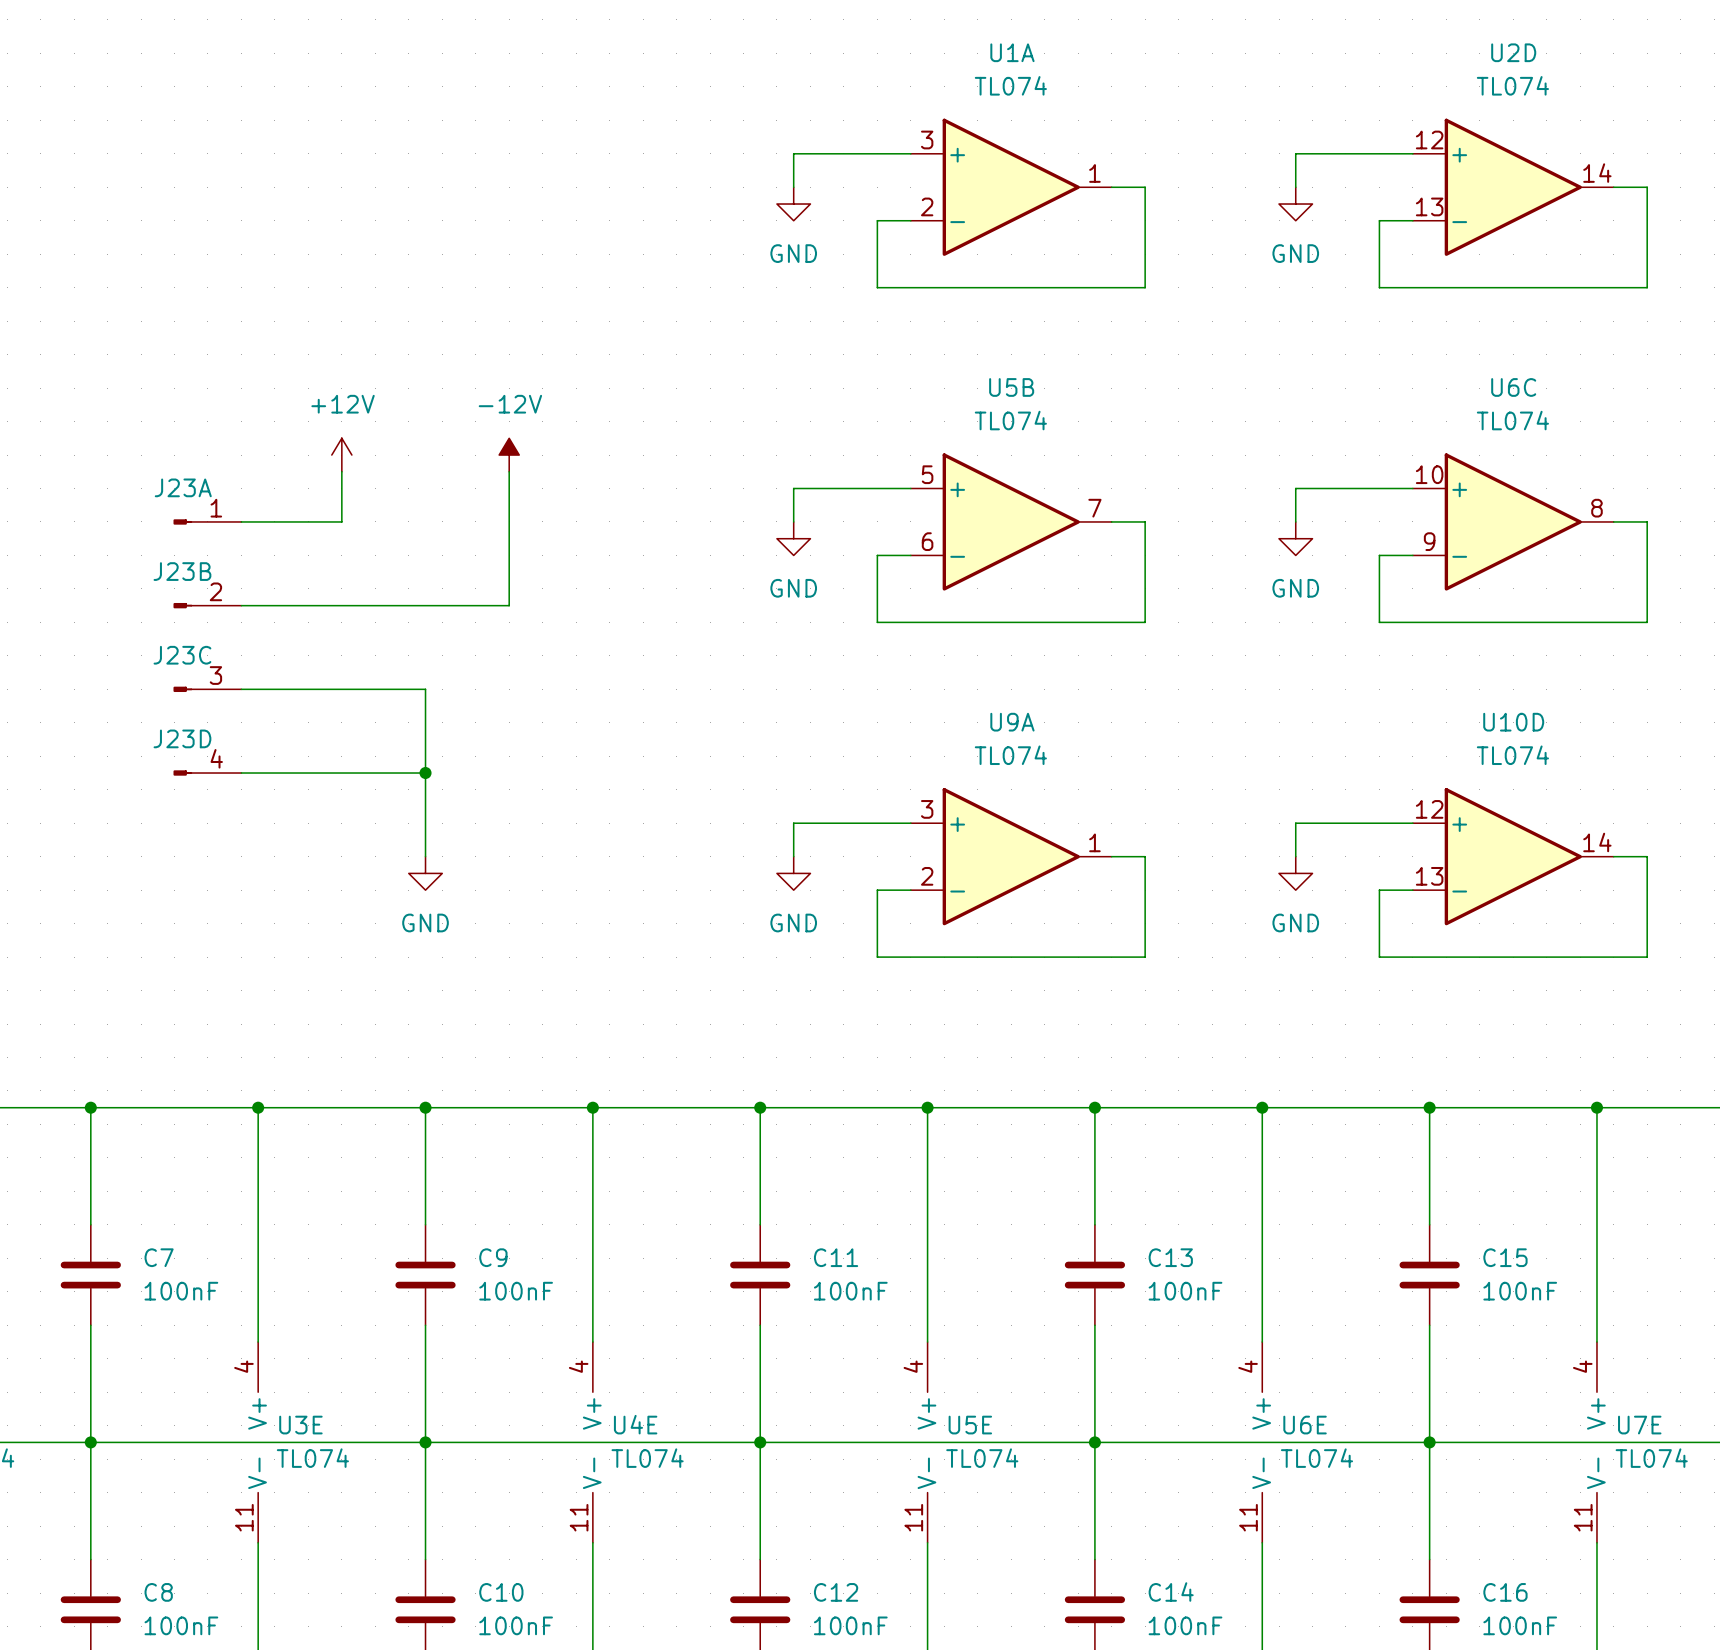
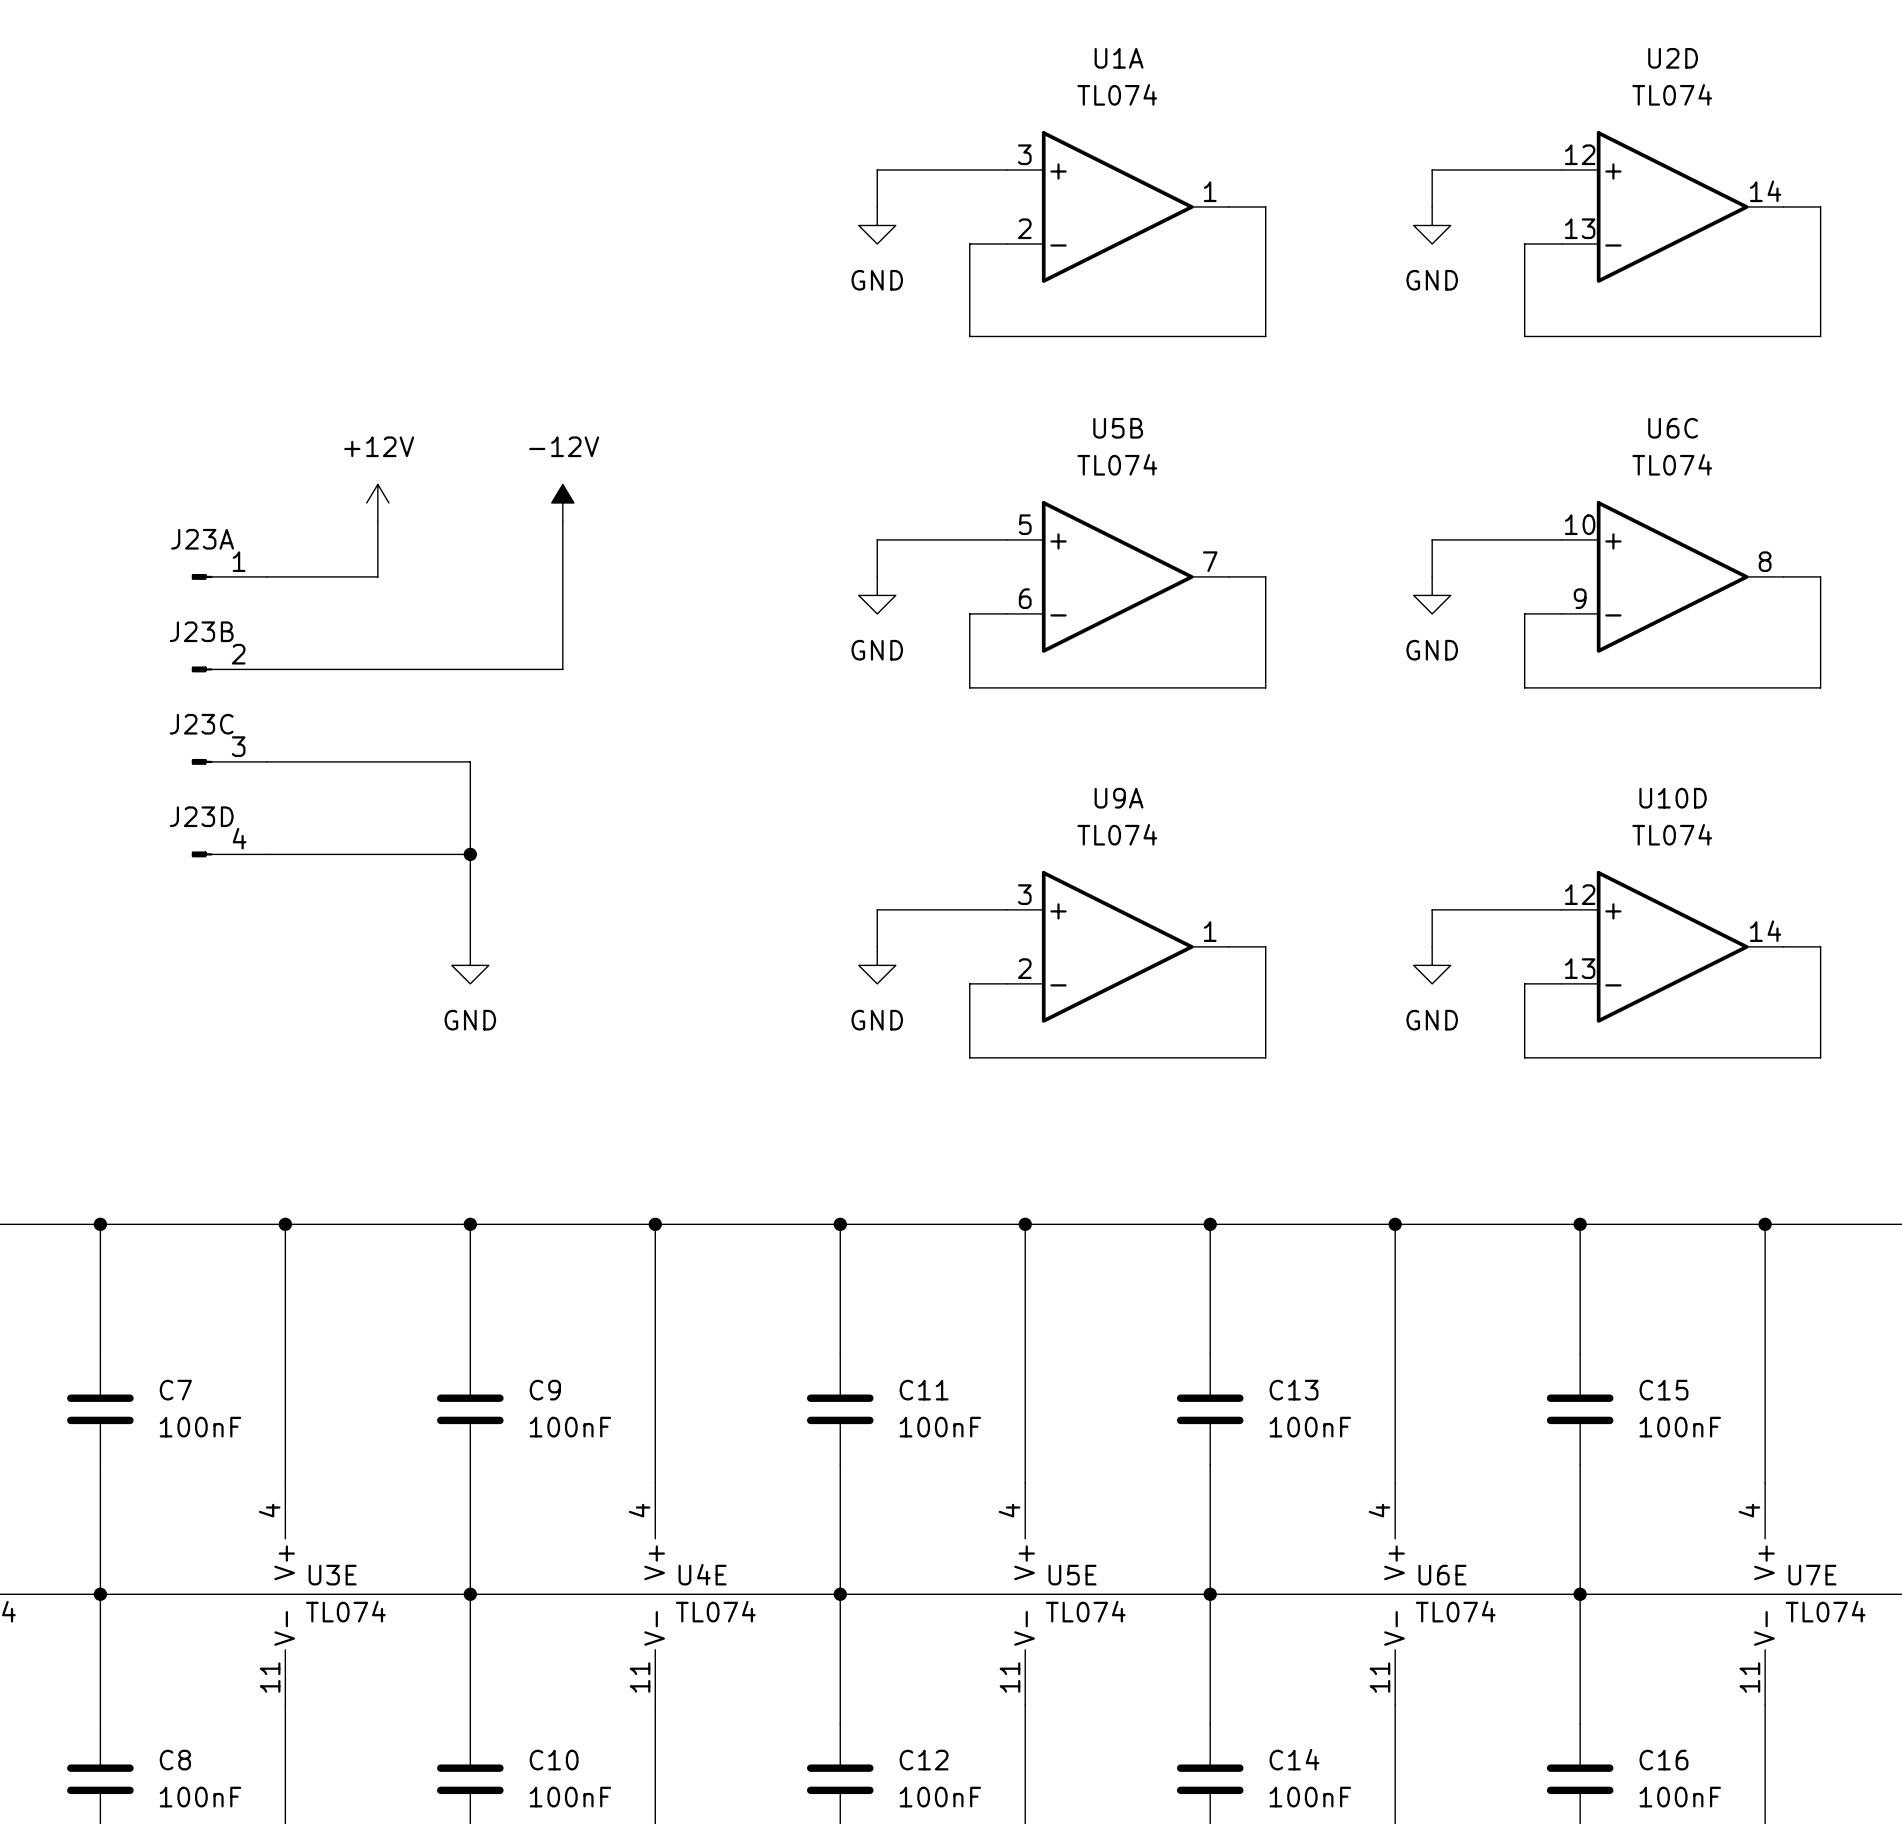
wire: (877, 287) (1145, 287) -> (969, 317) (969, 336) (1265, 336) (1265, 317)
wire: (1379, 287) (1647, 287) -> (1524, 317) (1524, 336) (1820, 336) (1820, 317)

